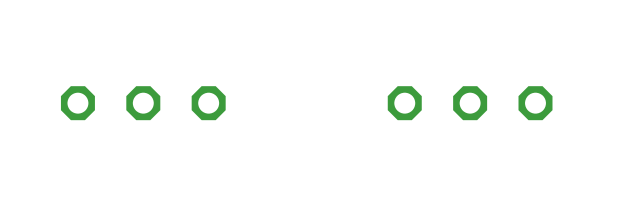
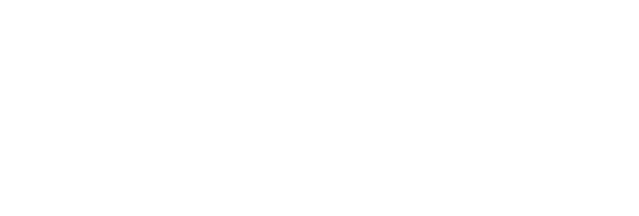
part: (143, 103) -> none
part: (470, 103) -> none

